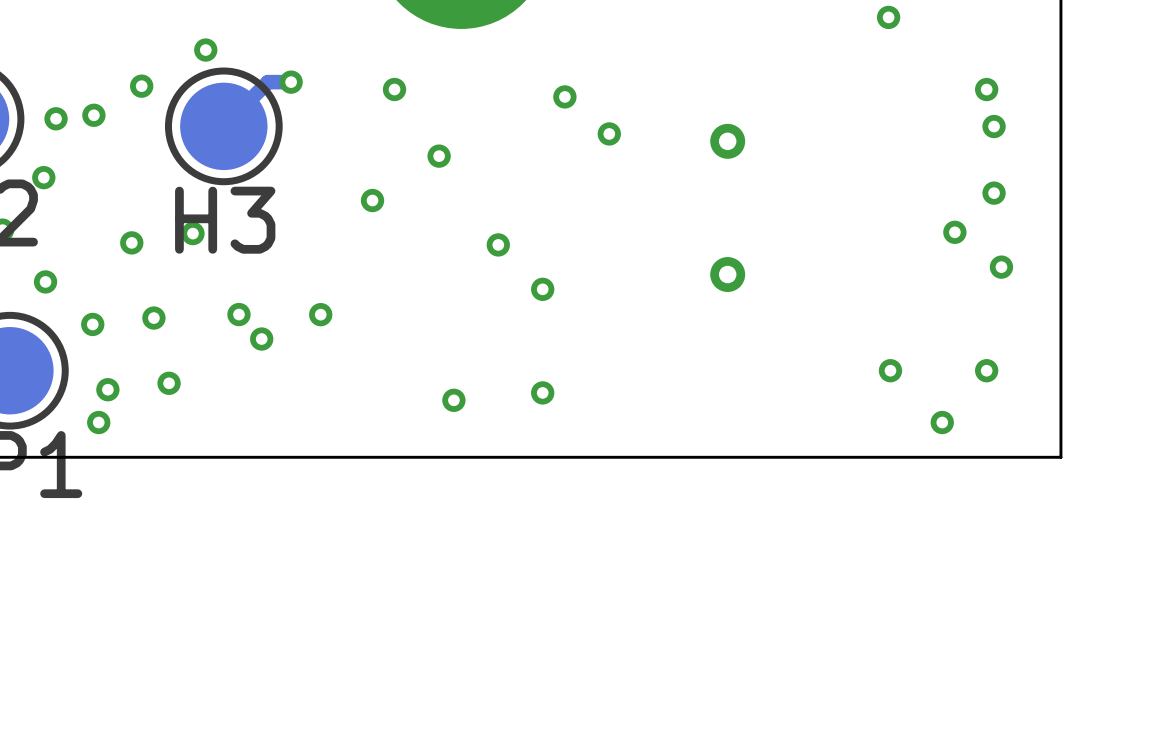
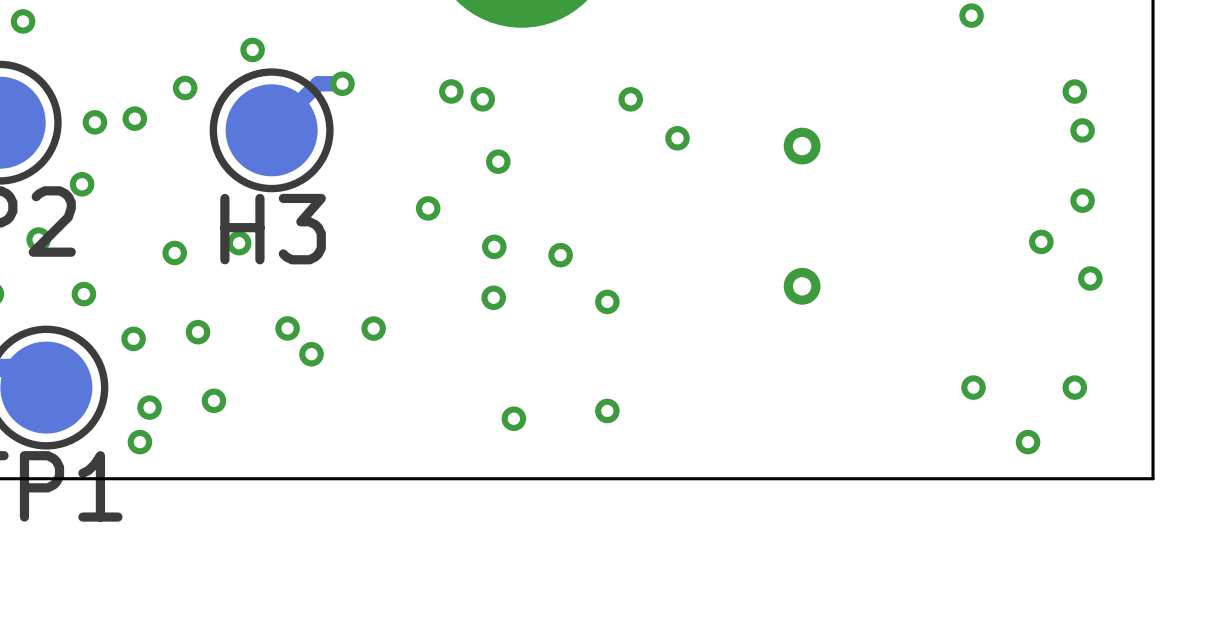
via: none -> (482, 99)
via: none -> (494, 246)
via: none -> (493, 297)

